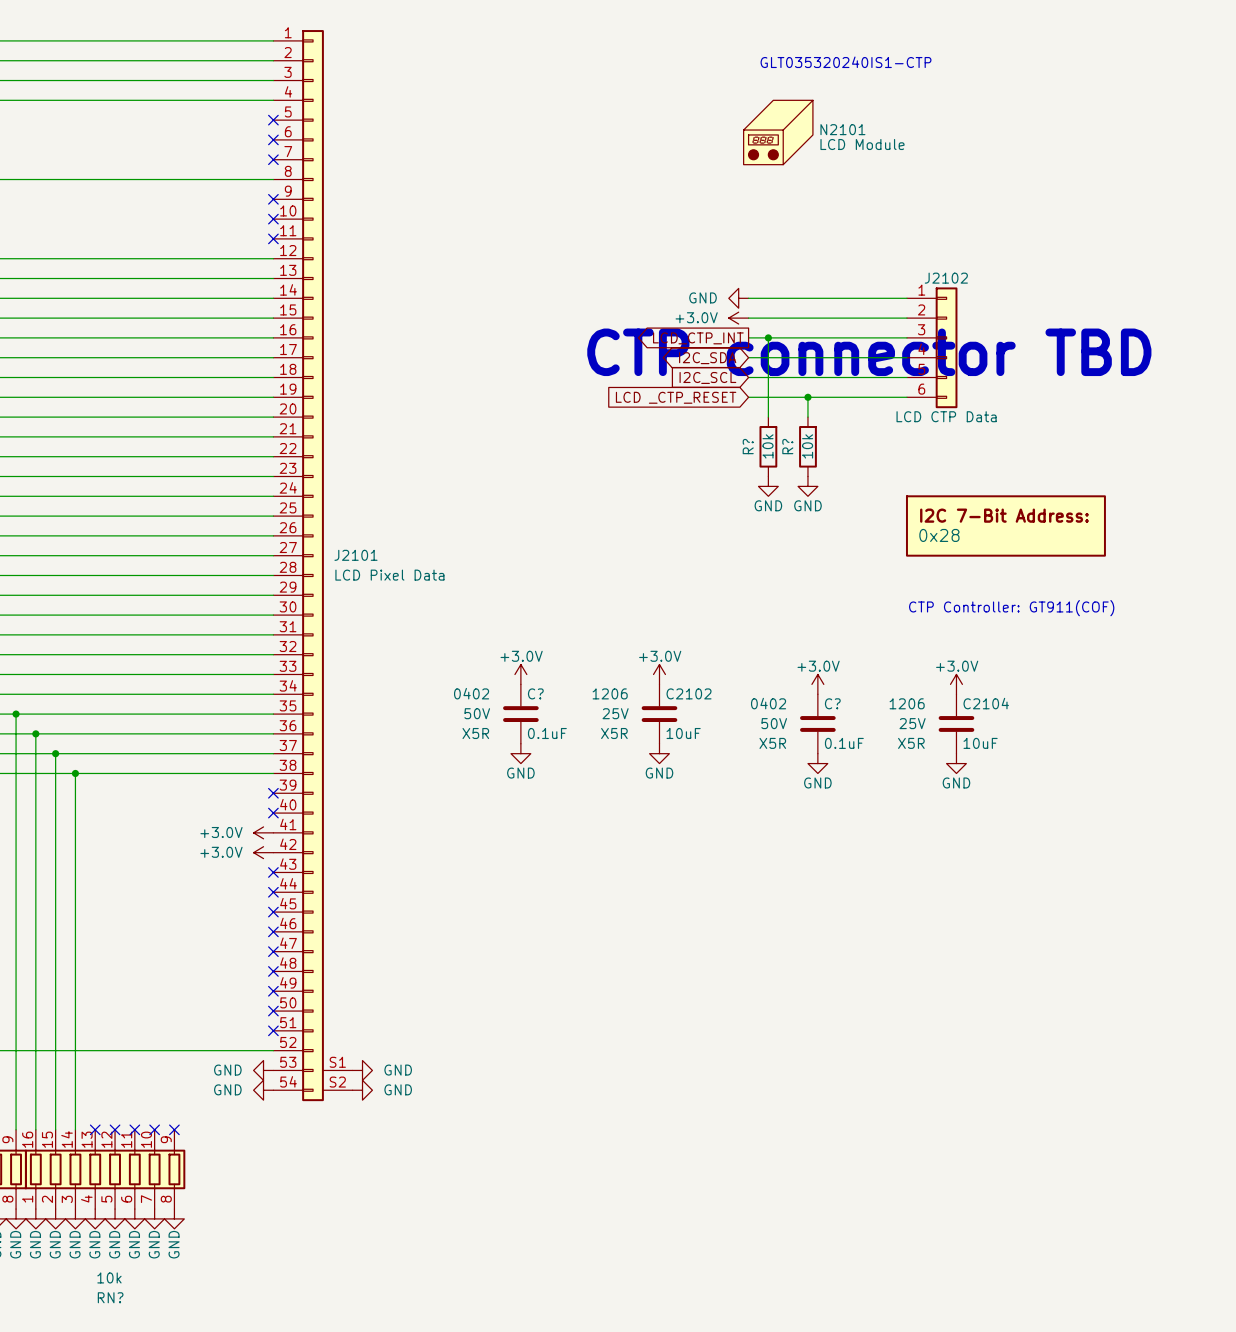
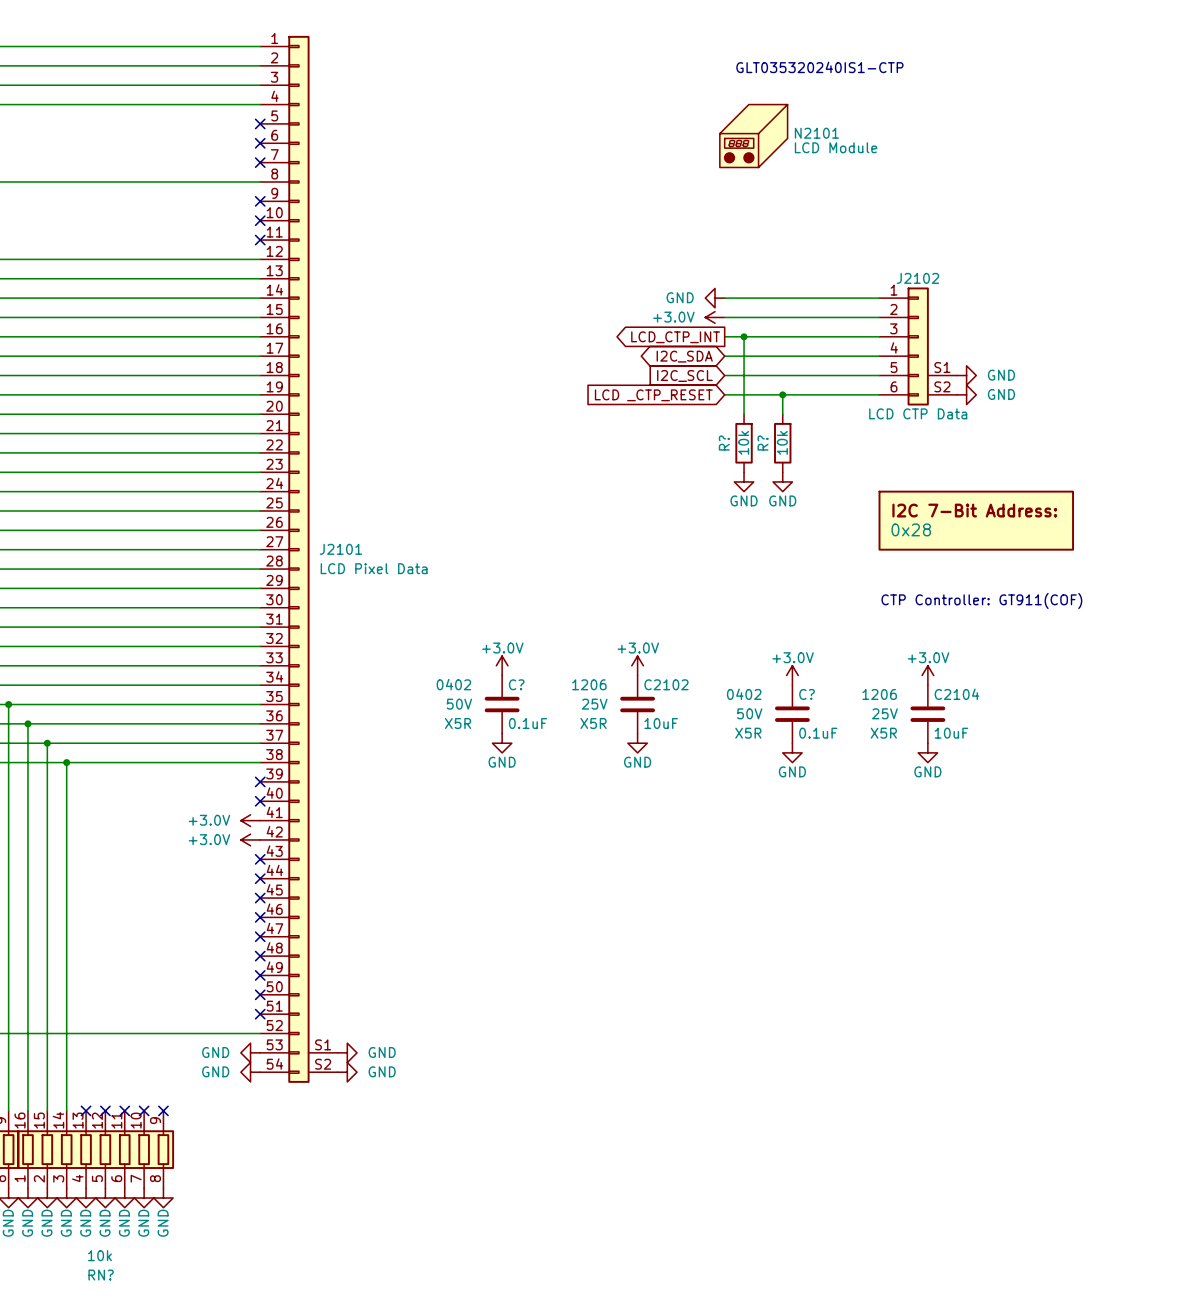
J2102 symbol: [906, 287, 958, 409] -> [879, 287, 957, 406]
text: CTP connector TBD (869, 352) -> none
power symbol: none -> GND (966, 375)
power symbol: none -> GND (966, 394)

